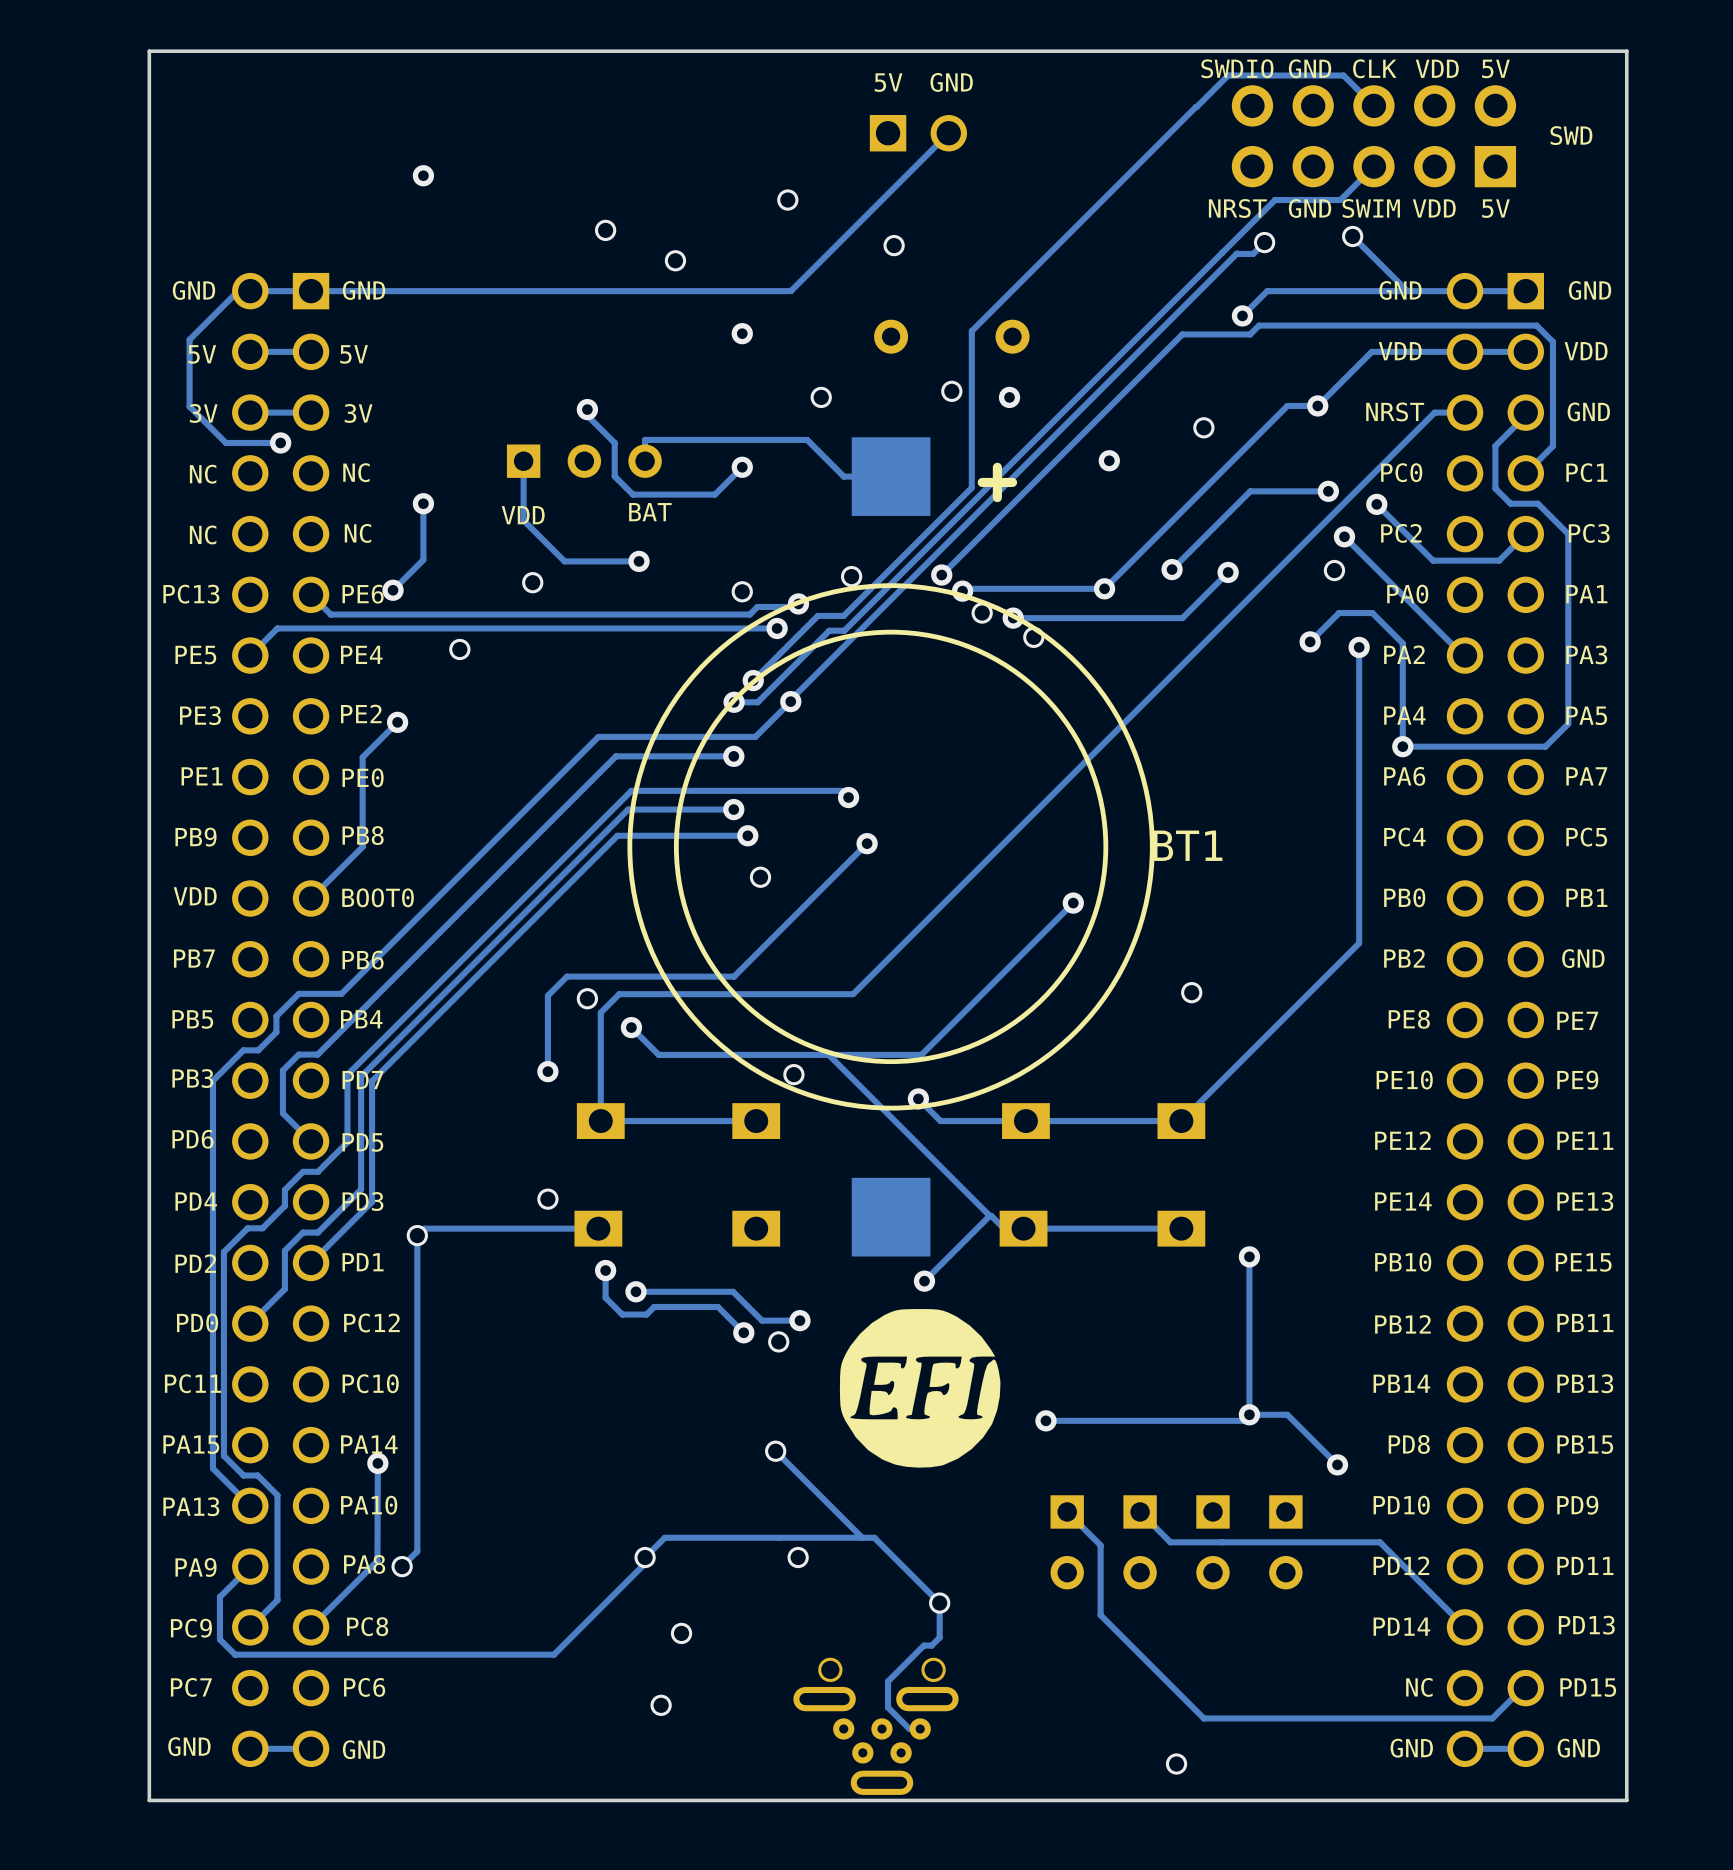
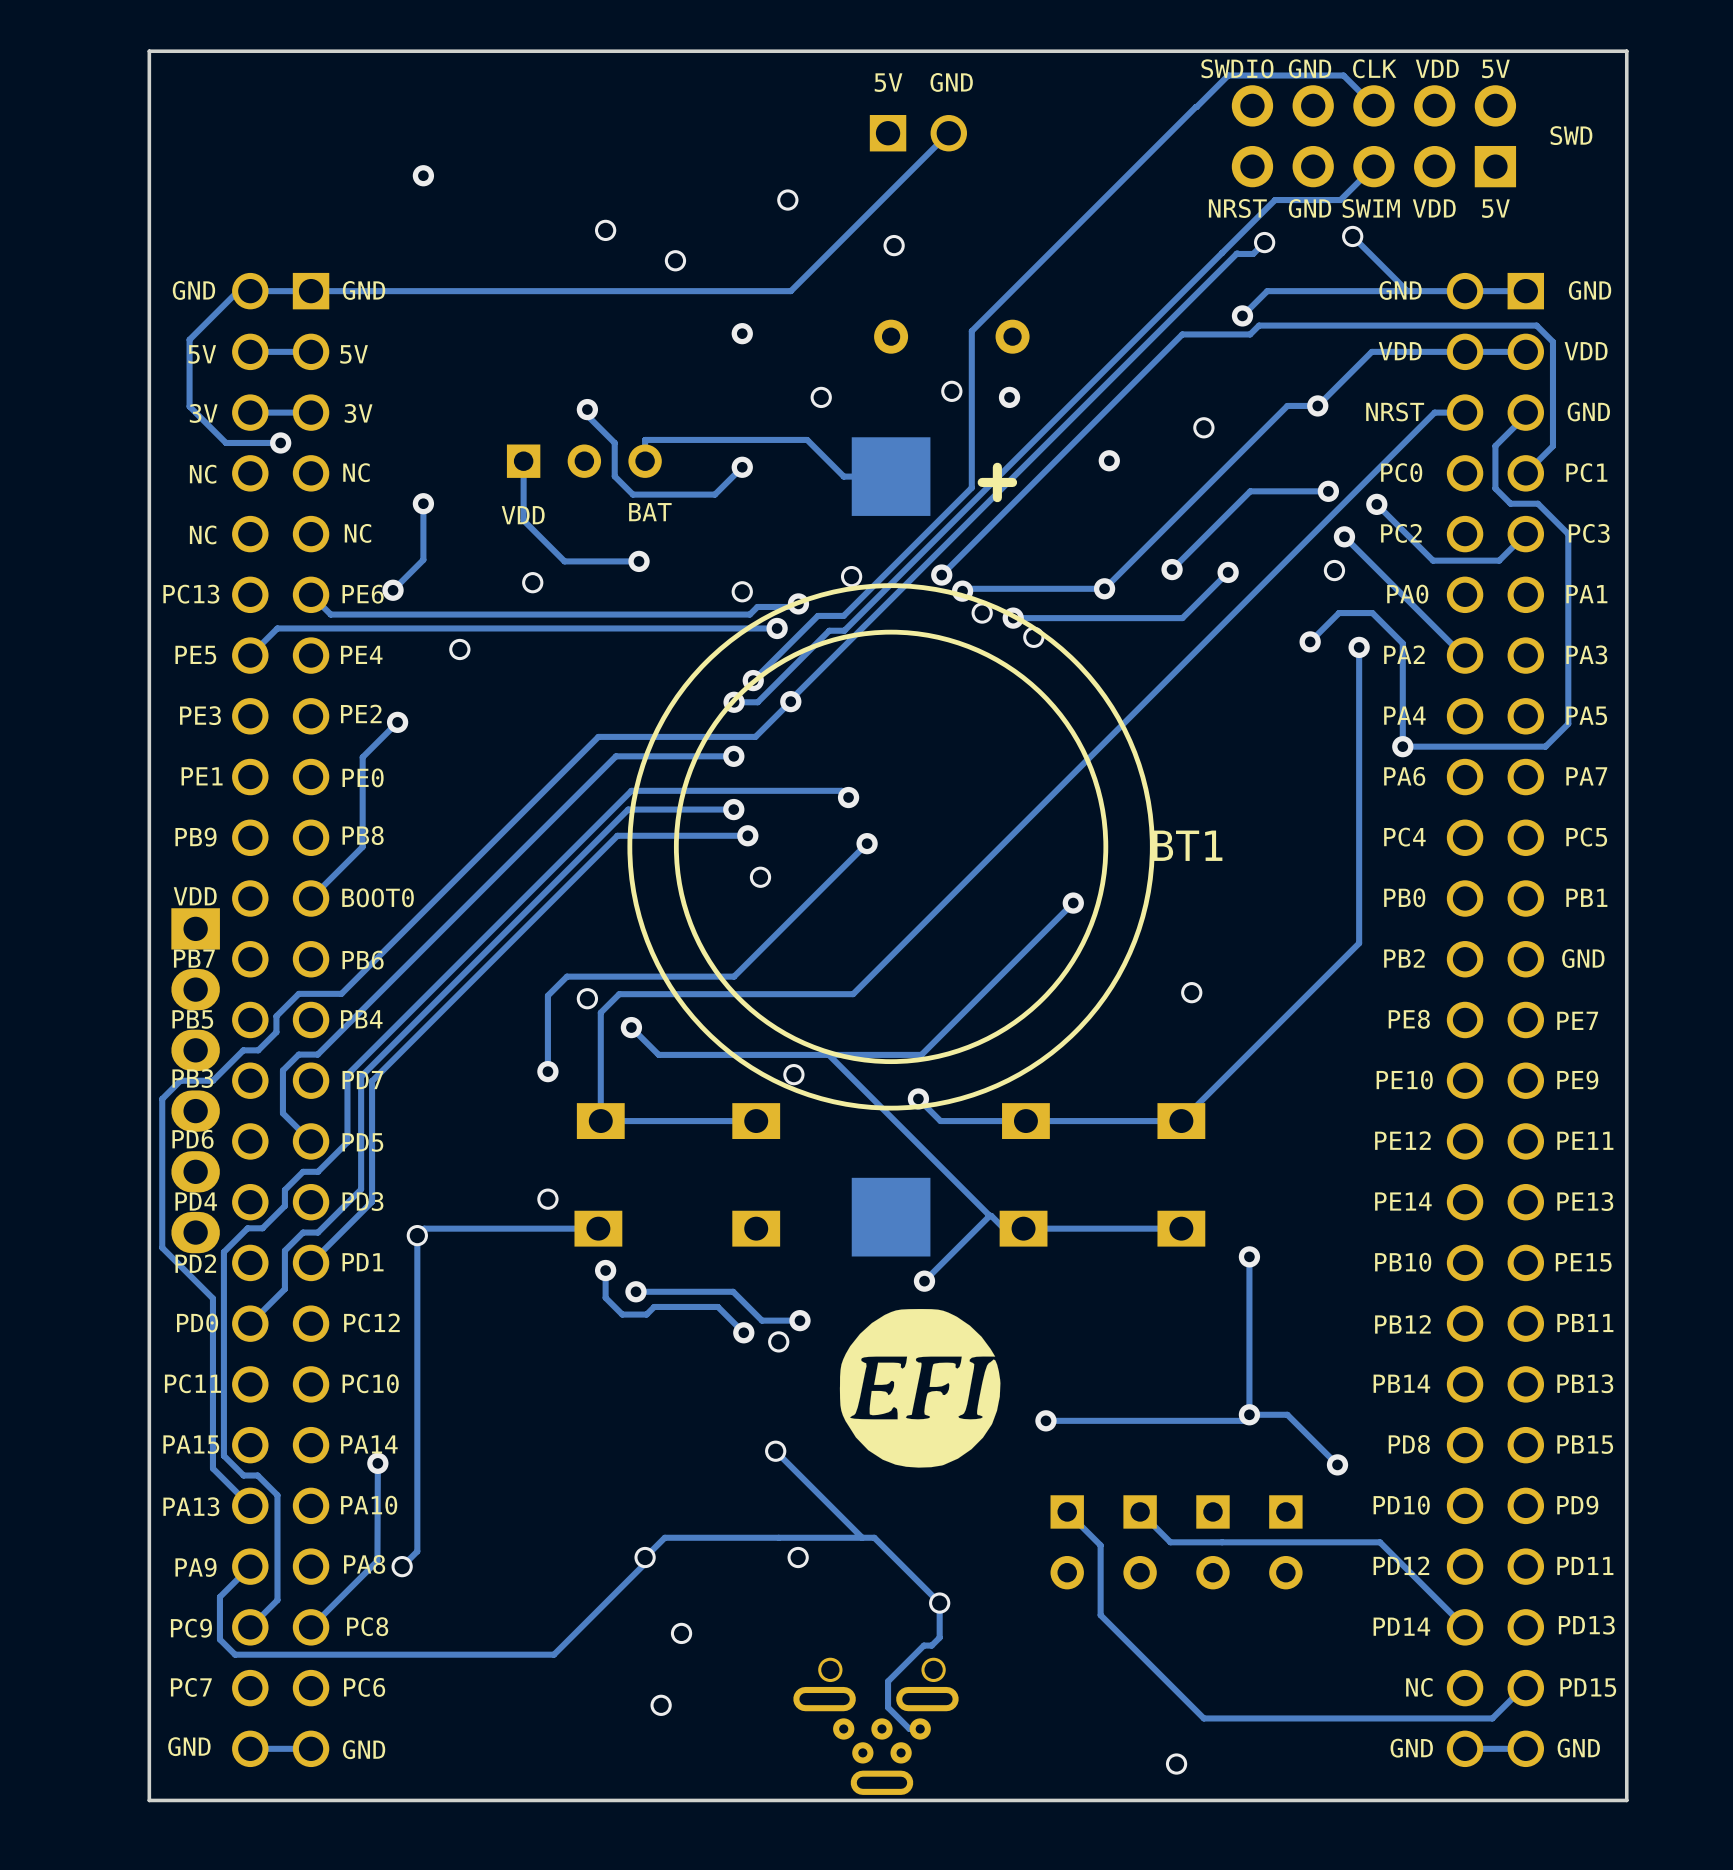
part: none -> (195, 1080)
track: (212, 1080) (212, 1298) -> (212, 1080) (180, 1080) (162, 1099) (162, 1247) (212, 1298)

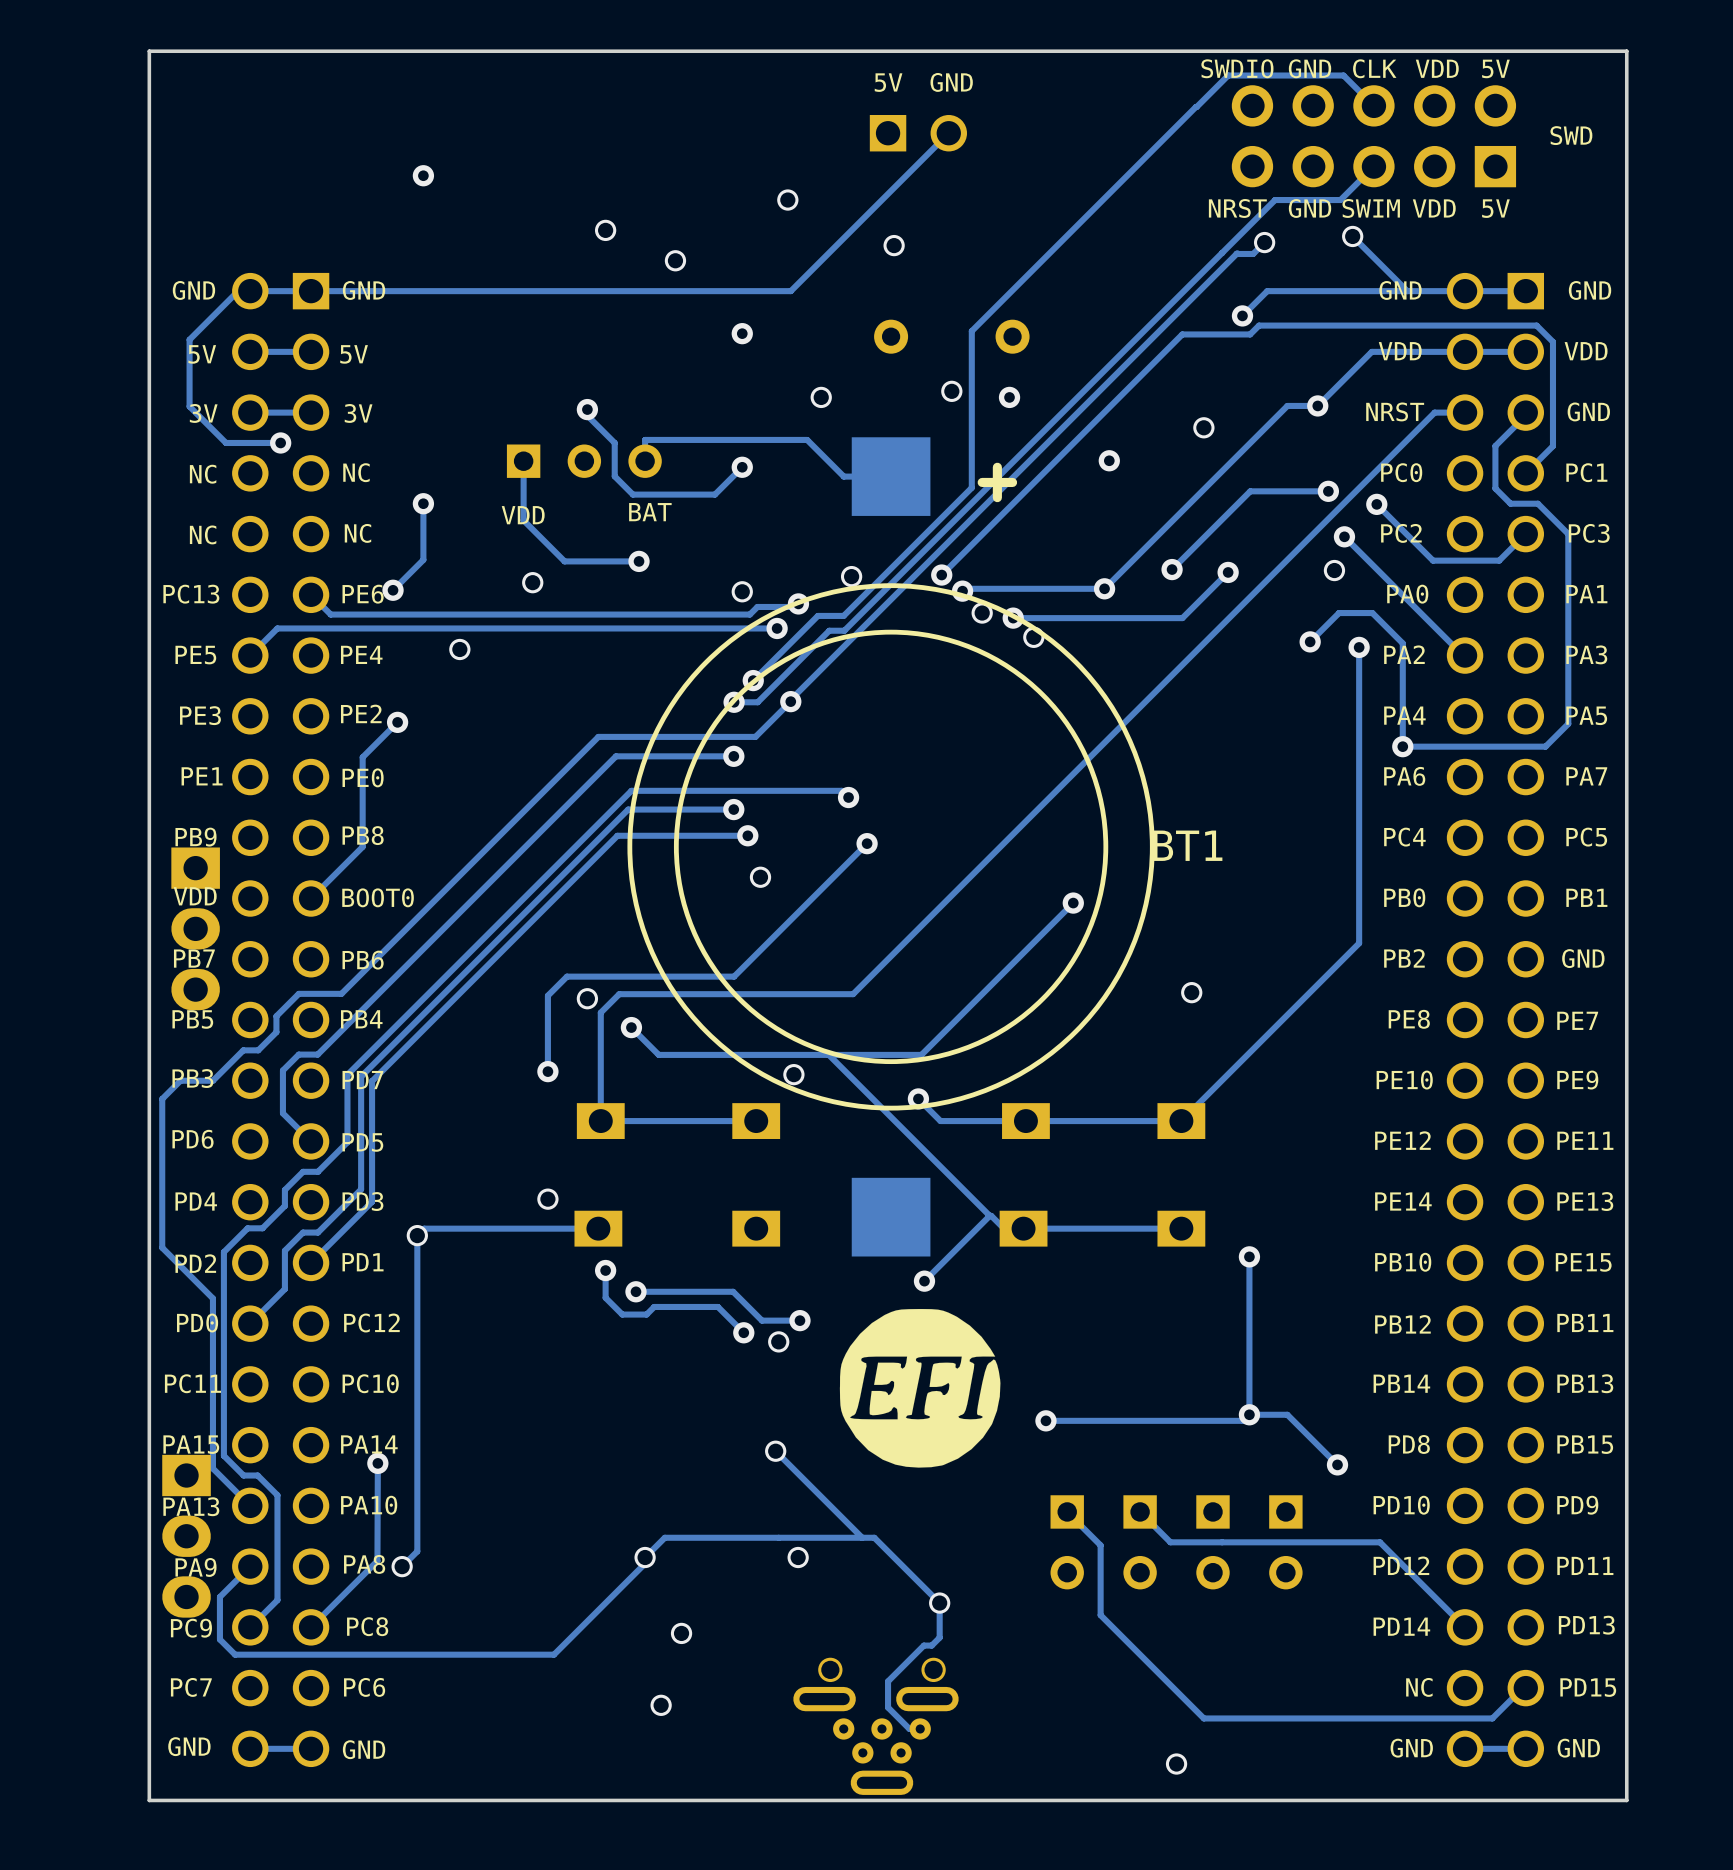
part: none -> (195, 928)
part: (195, 1080) -> none
part: none -> (186, 1536)

